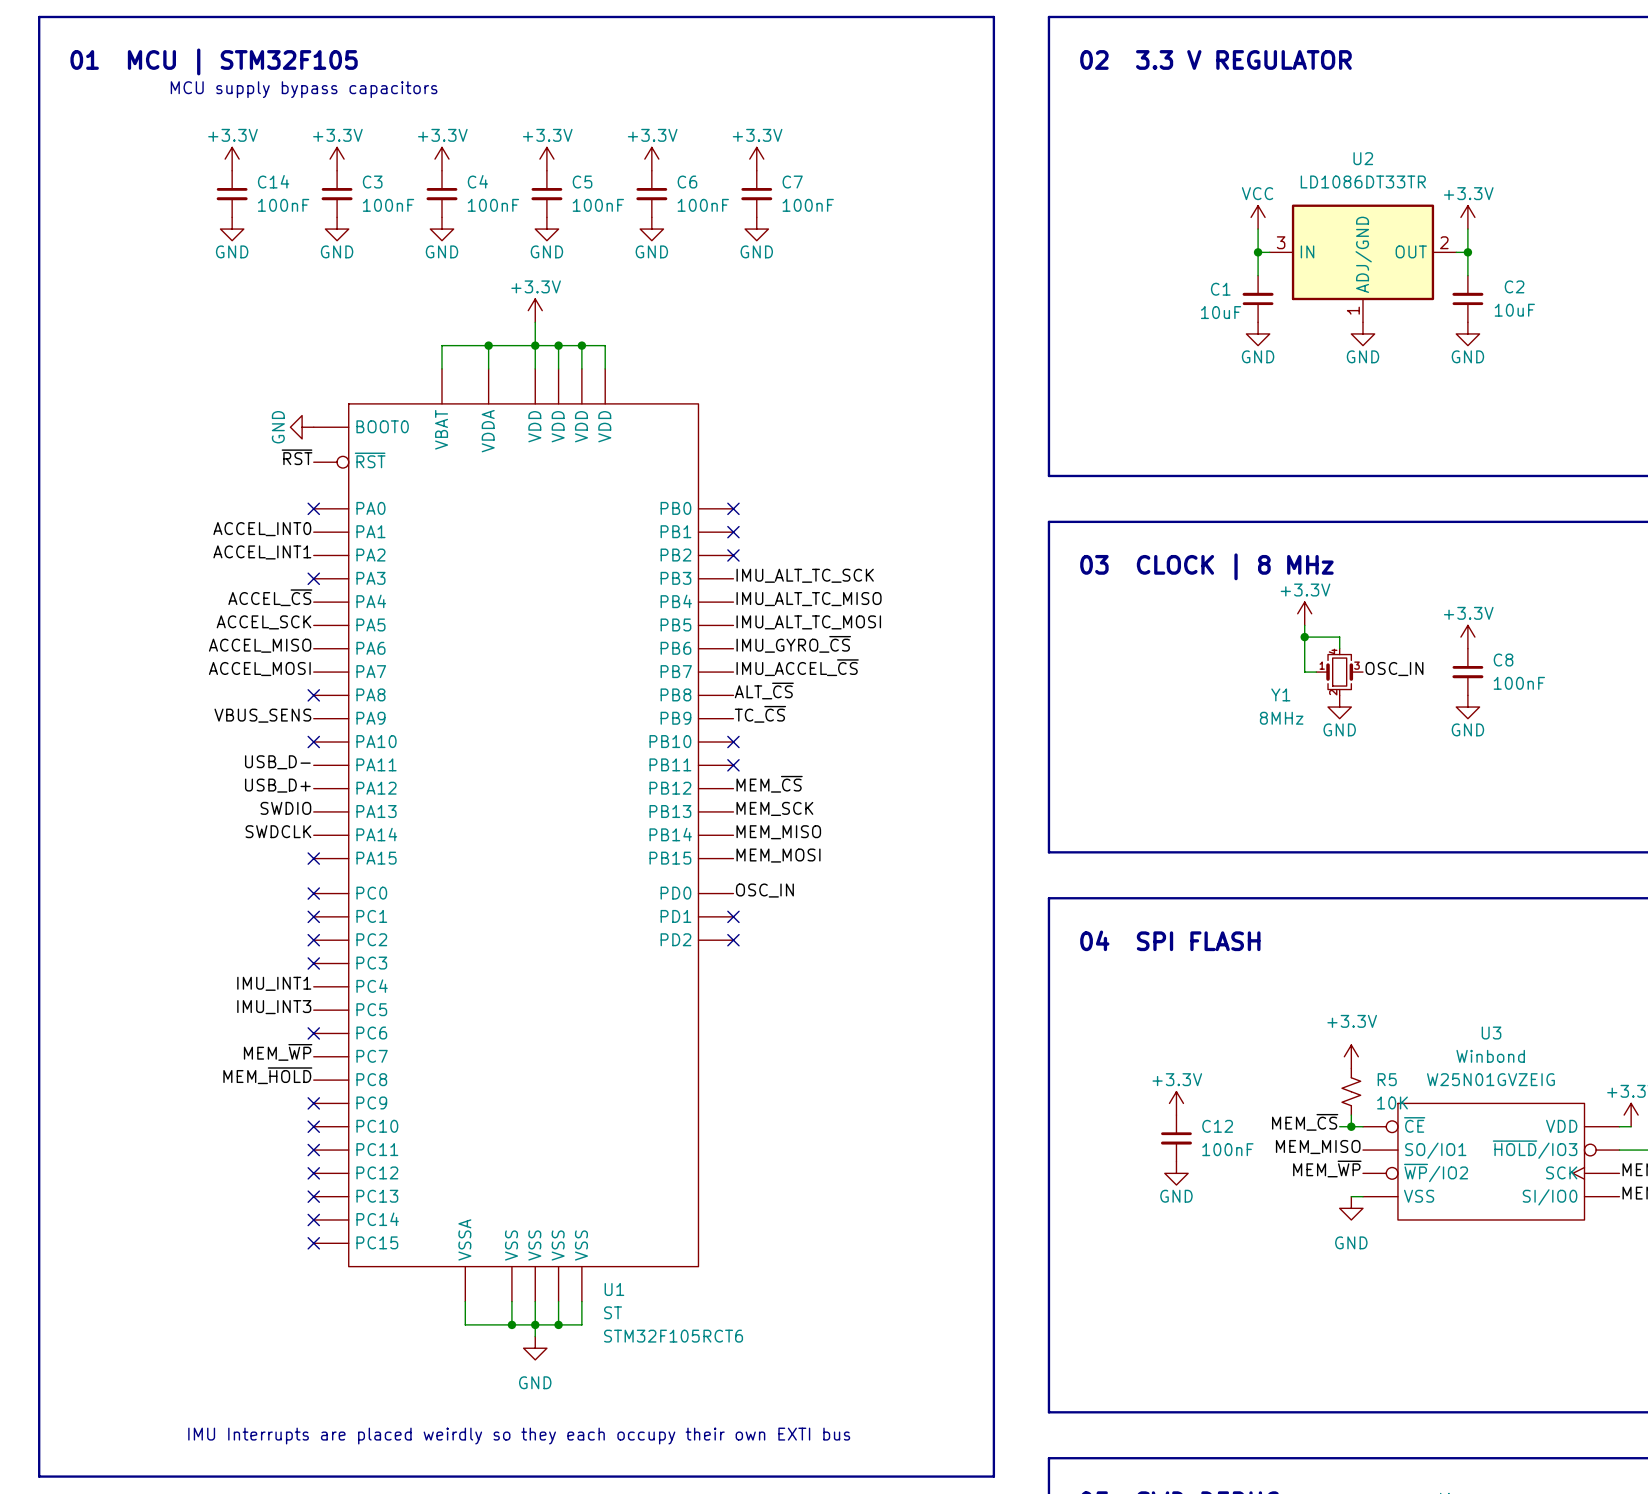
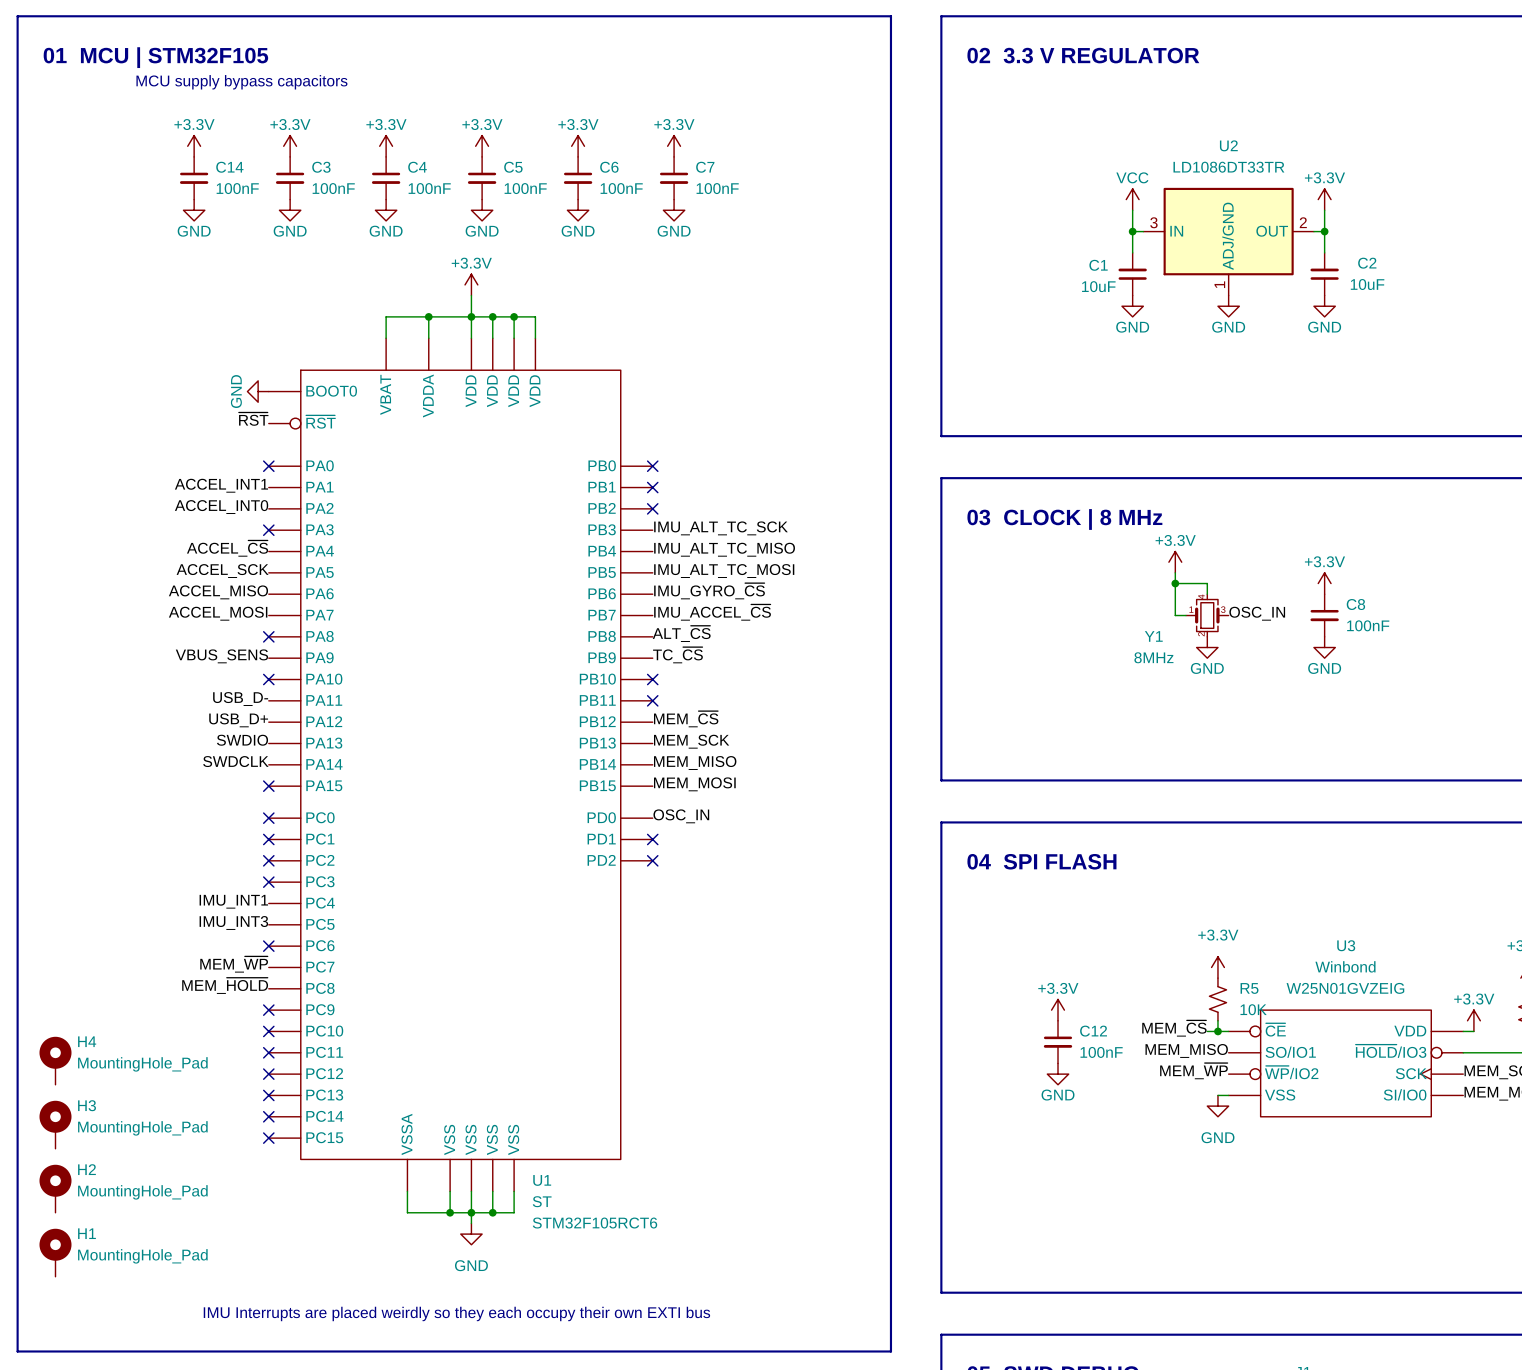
label: ACCEL_INT0 (262, 529) -> ACCEL_INT1 (221, 485)
label: ACCEL_INT1 (262, 552) -> ACCEL_INT0 (221, 507)
H4: none -> MountingHole_Pad (55, 1060)
H3: none -> MountingHole_Pad (55, 1124)
H2: none -> MountingHole_Pad (55, 1188)
H1: none -> MountingHole_Pad (55, 1252)

